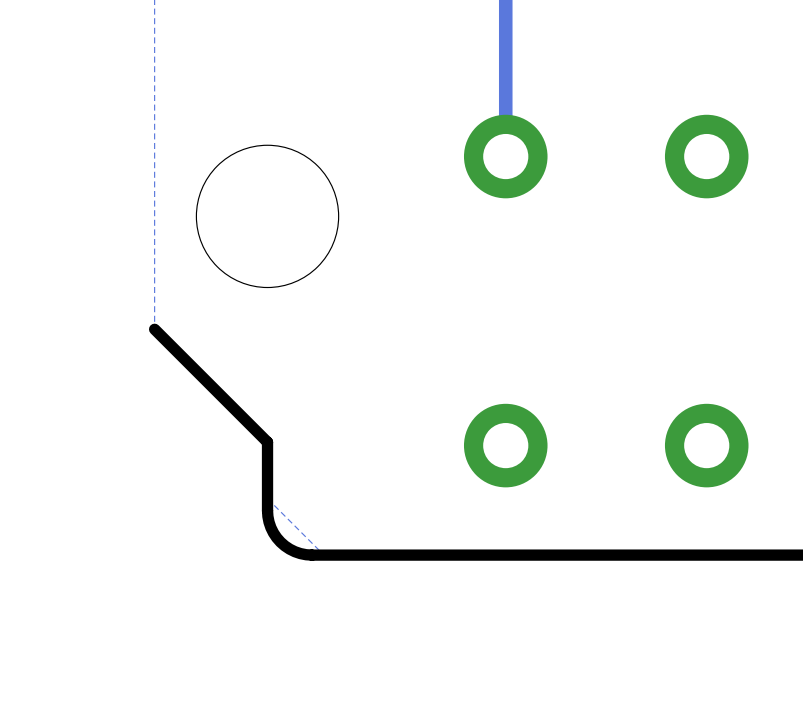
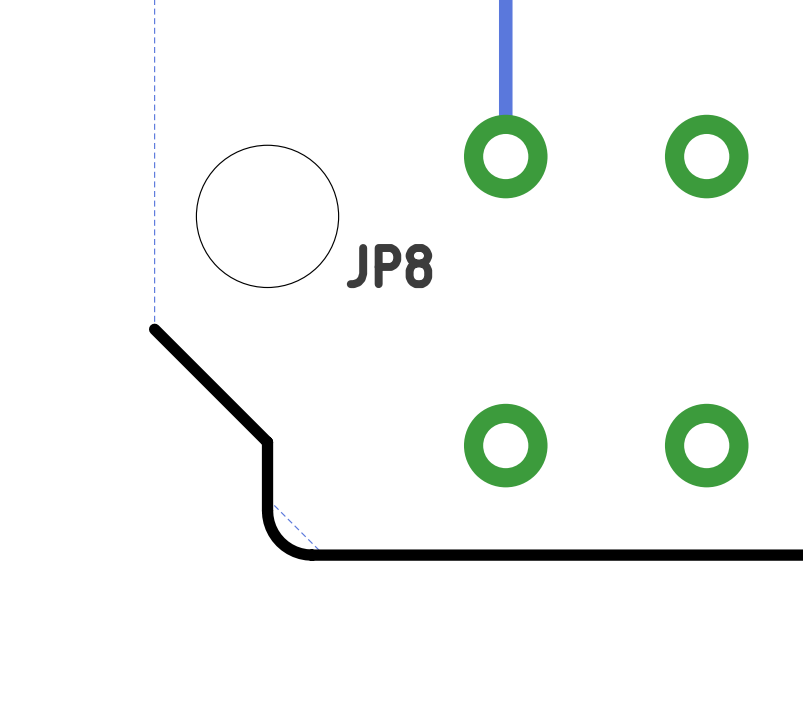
text: none -> JP8 (389, 266)

